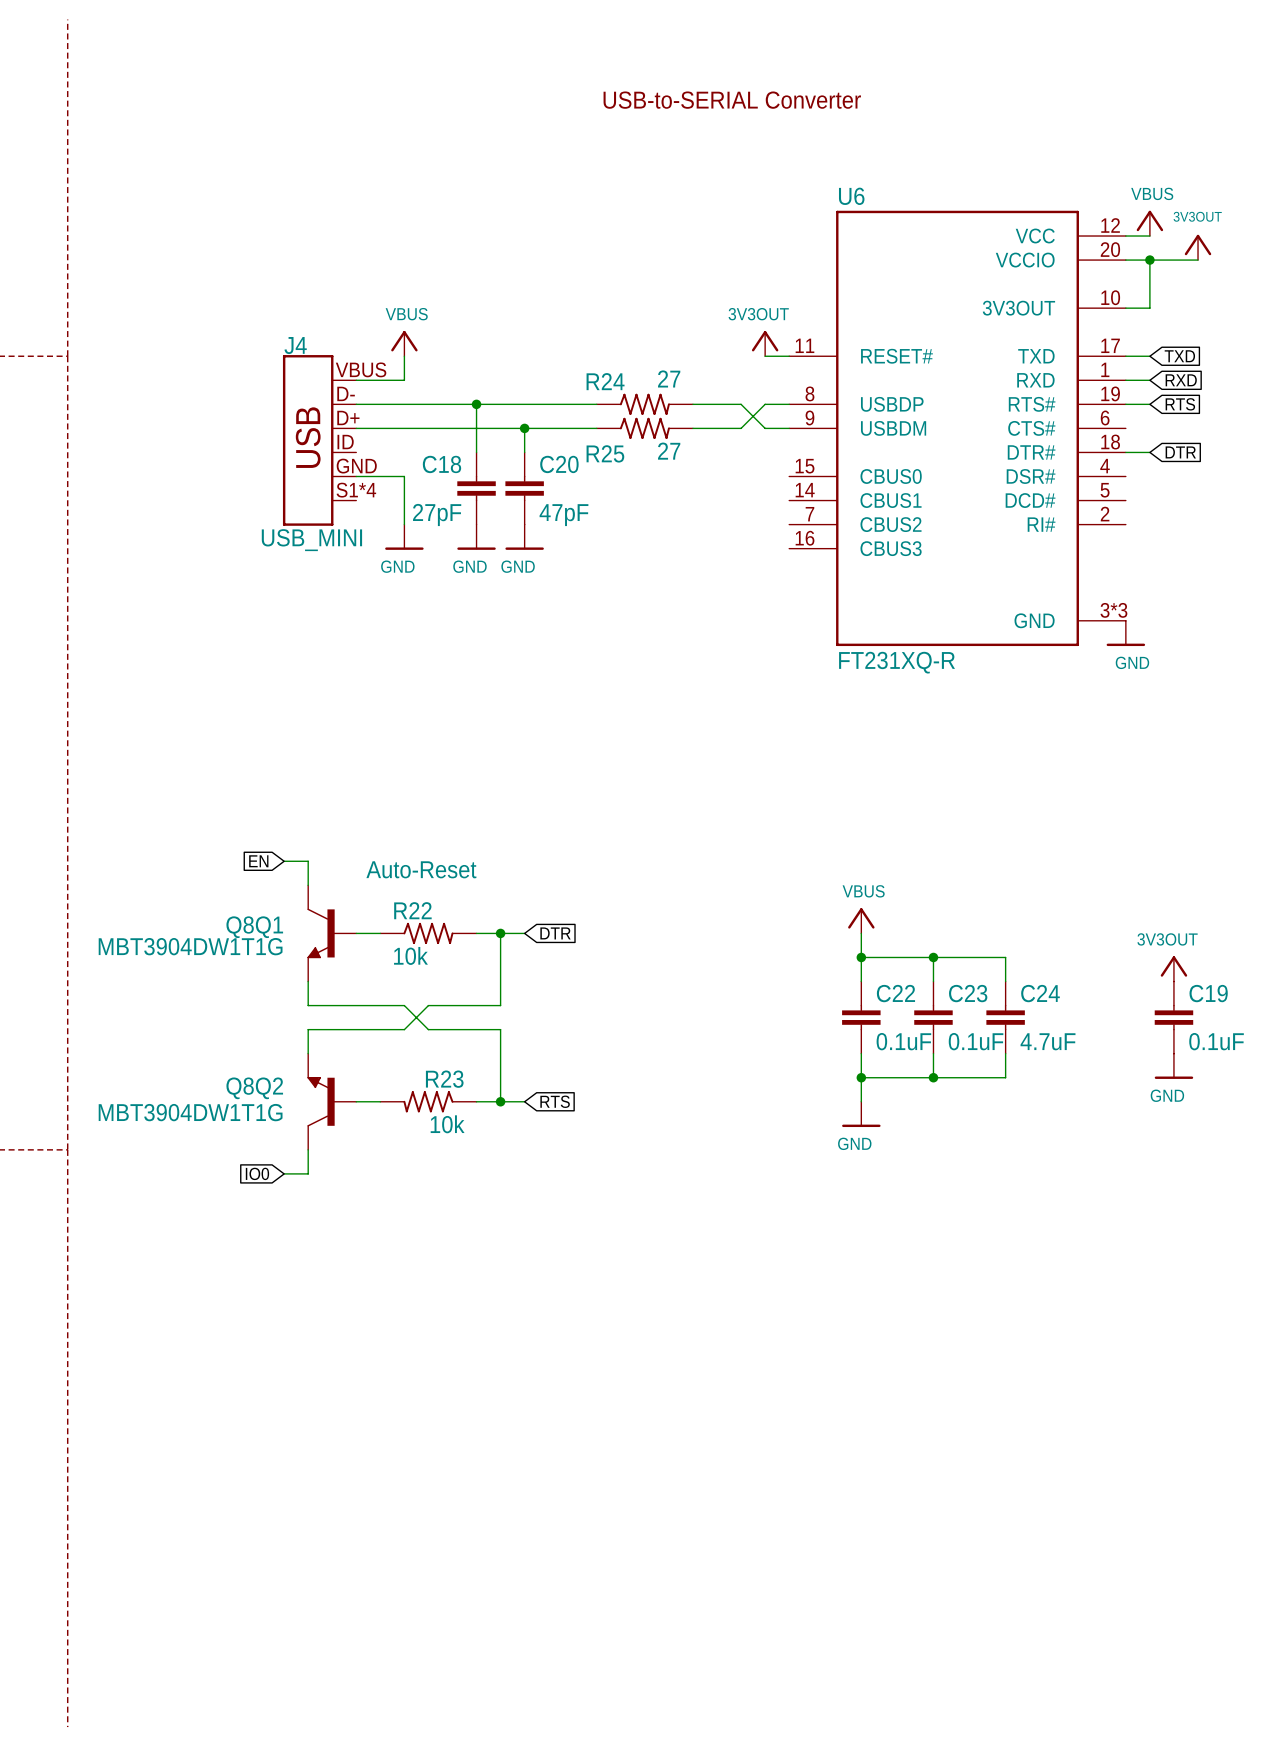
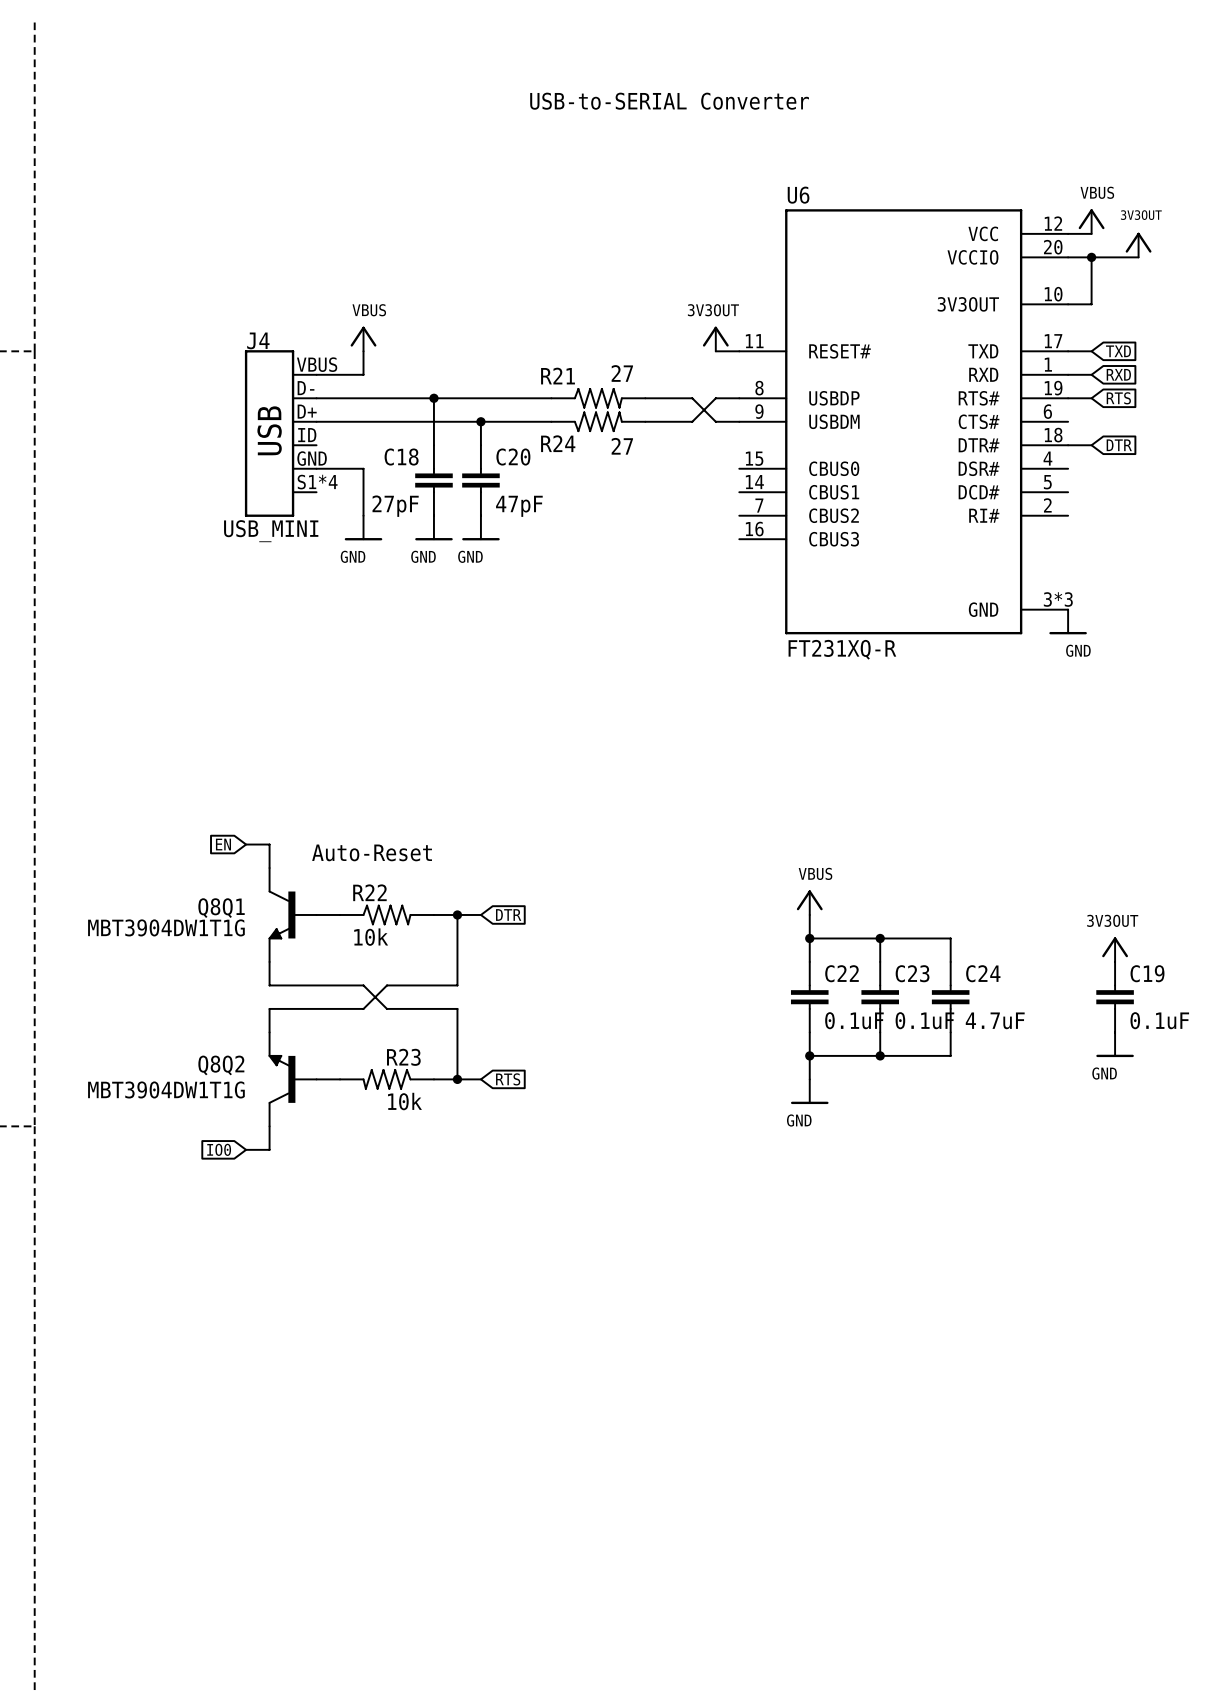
R24 name: R24 (605, 381) -> R21 (558, 376)
R25: 27 (644, 428) -> none
R24: none -> 27 (598, 421)

